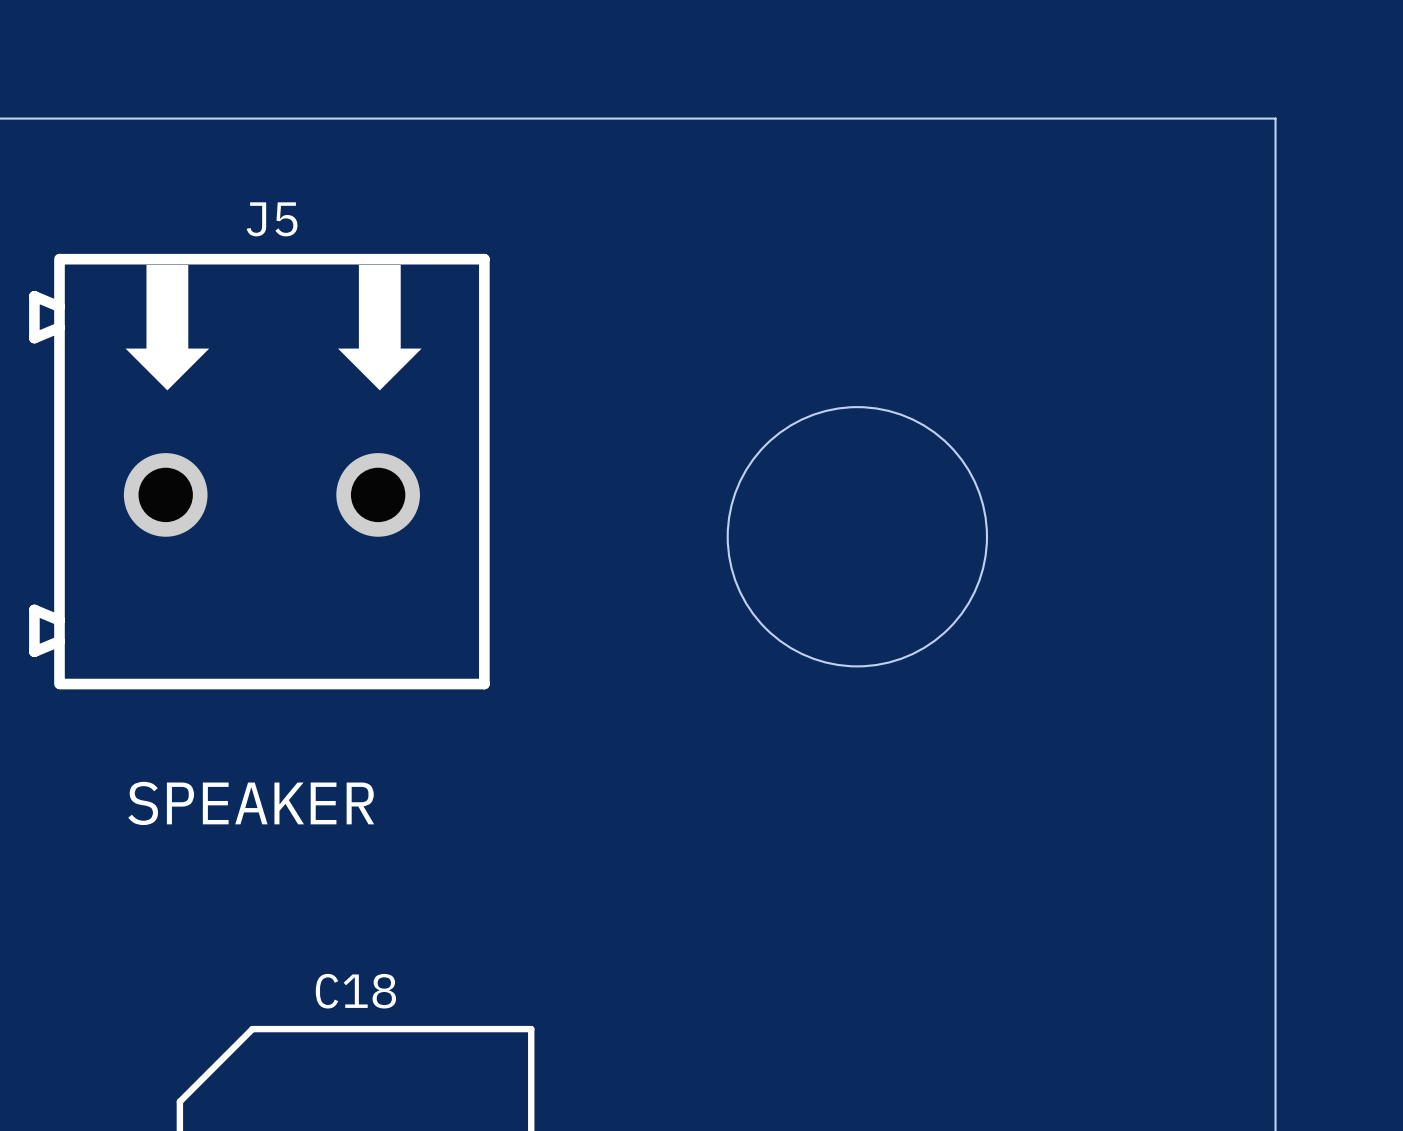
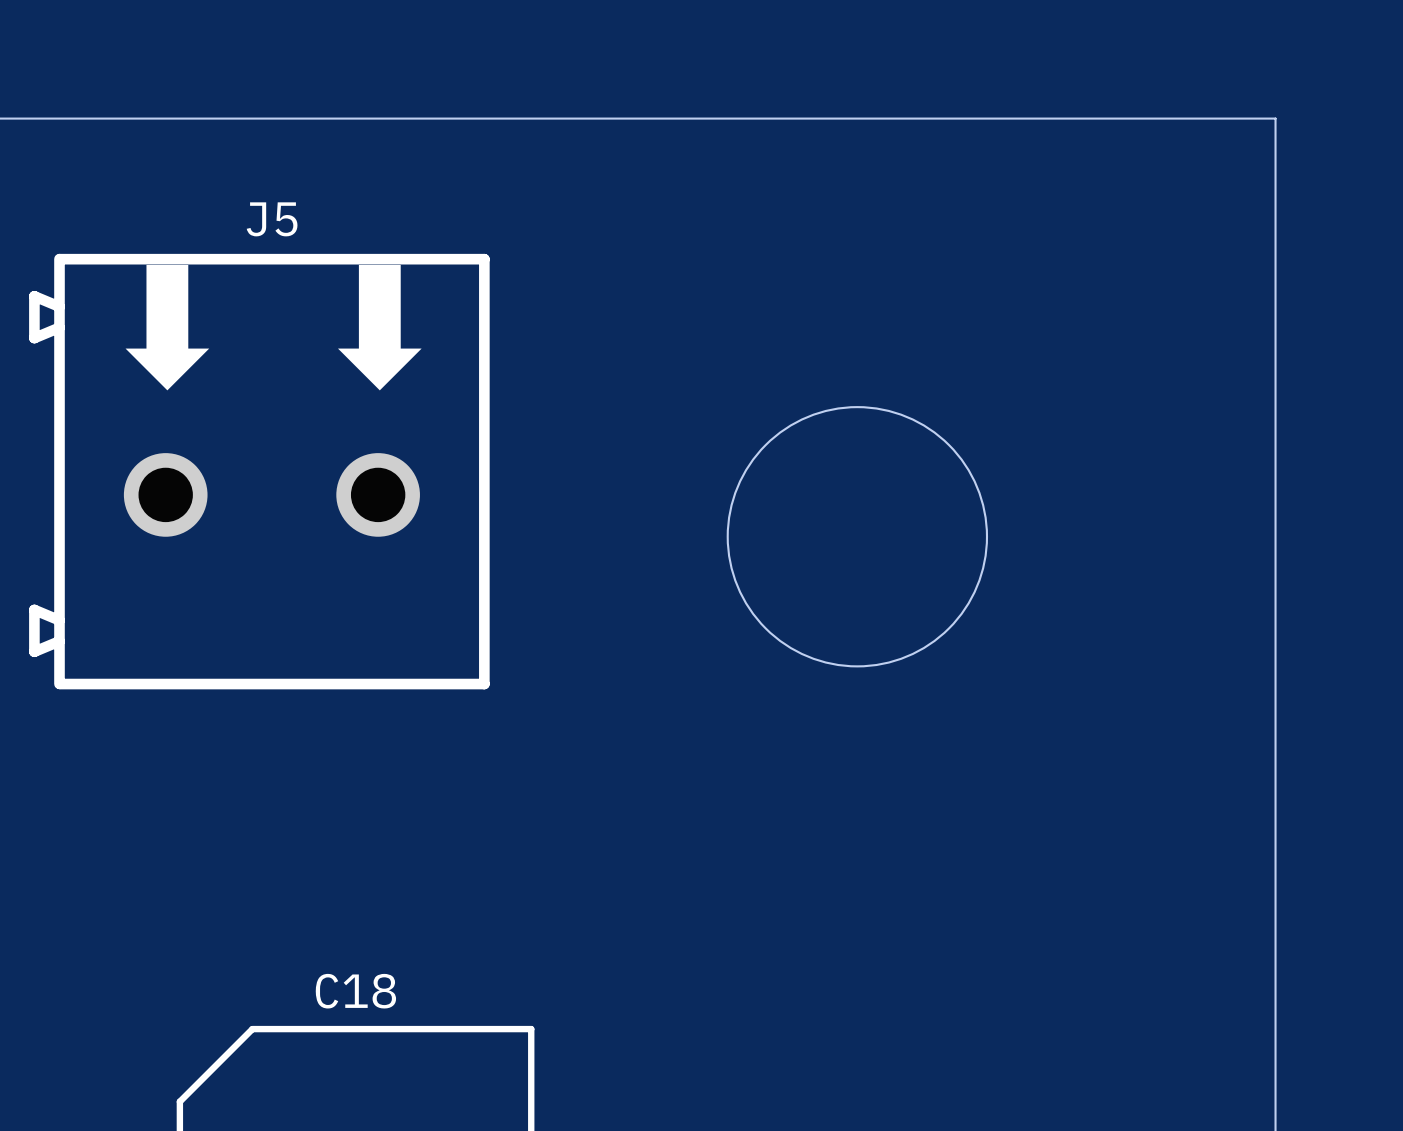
text: SPEAKER (251, 803) -> none

